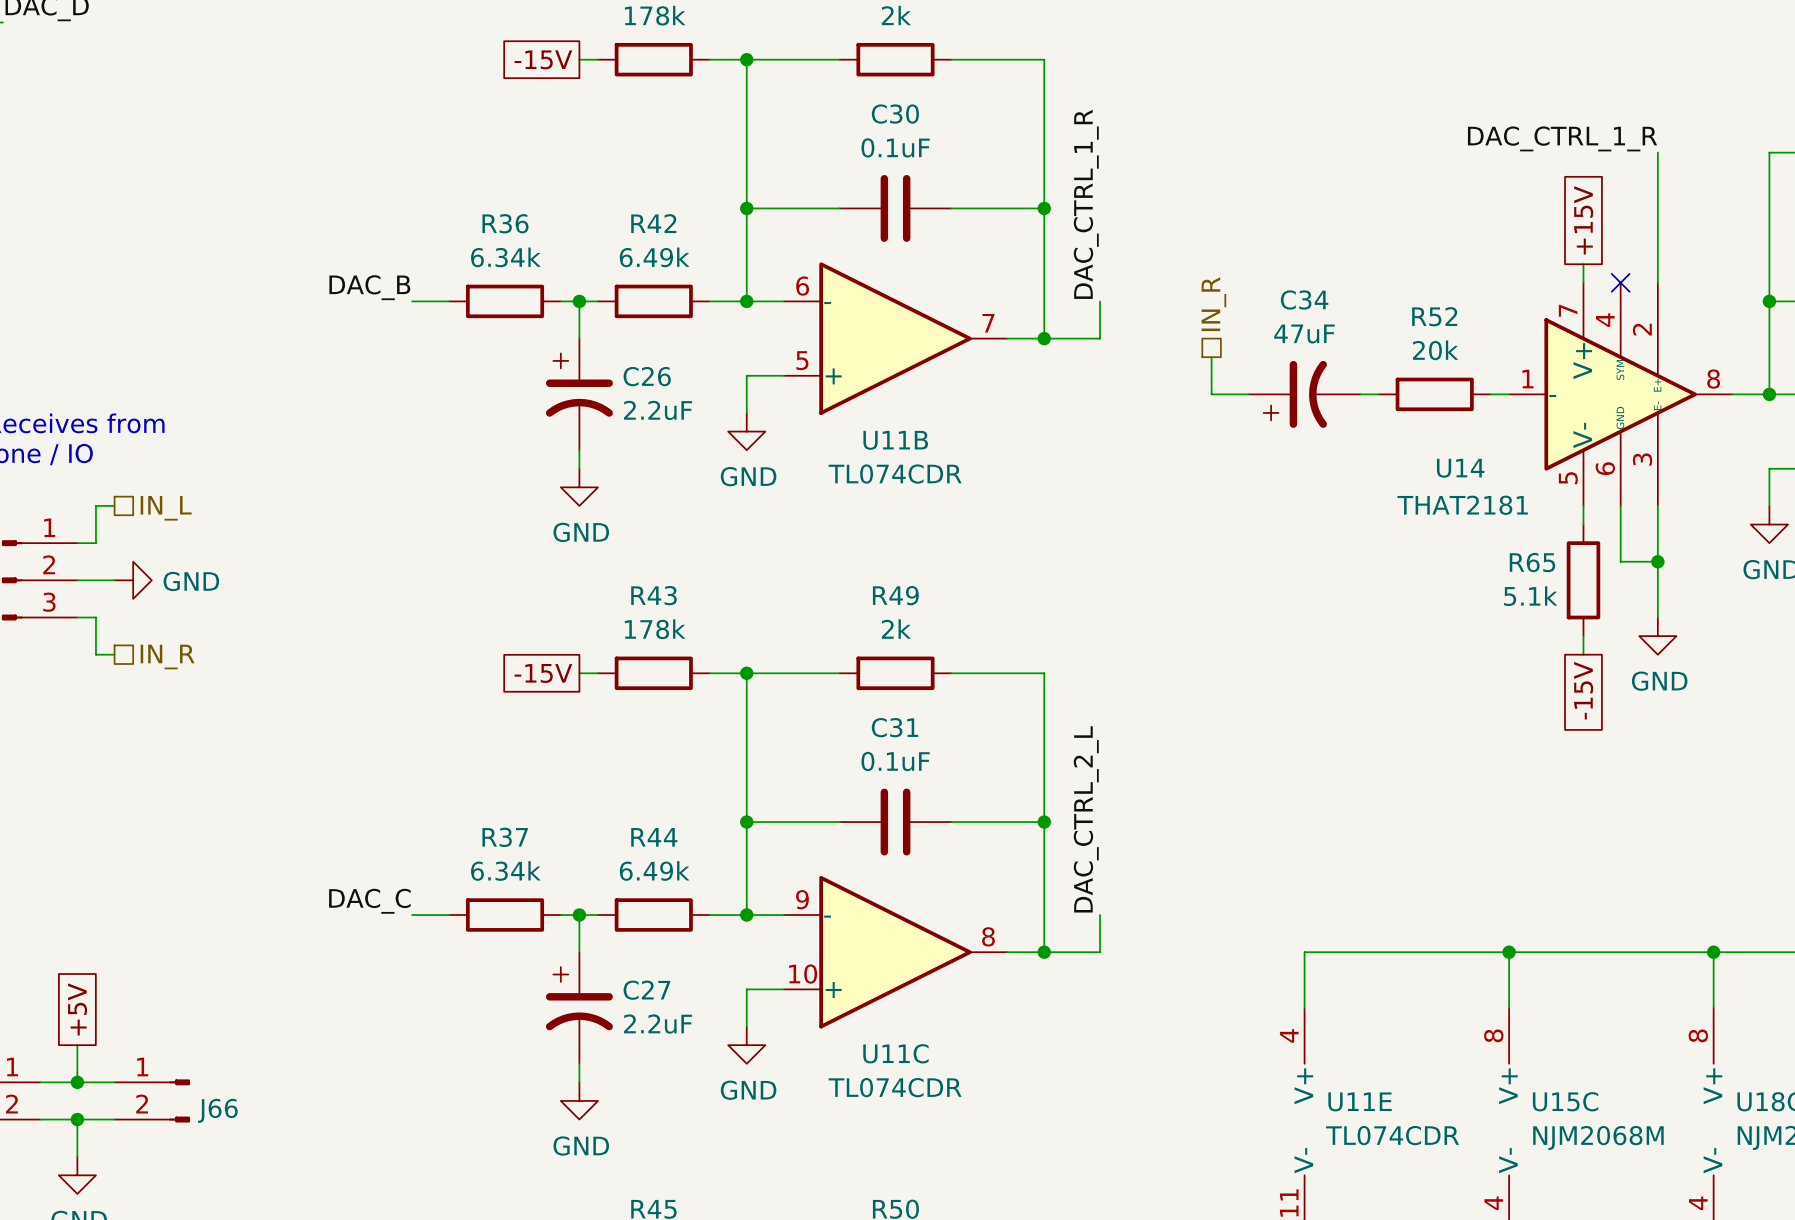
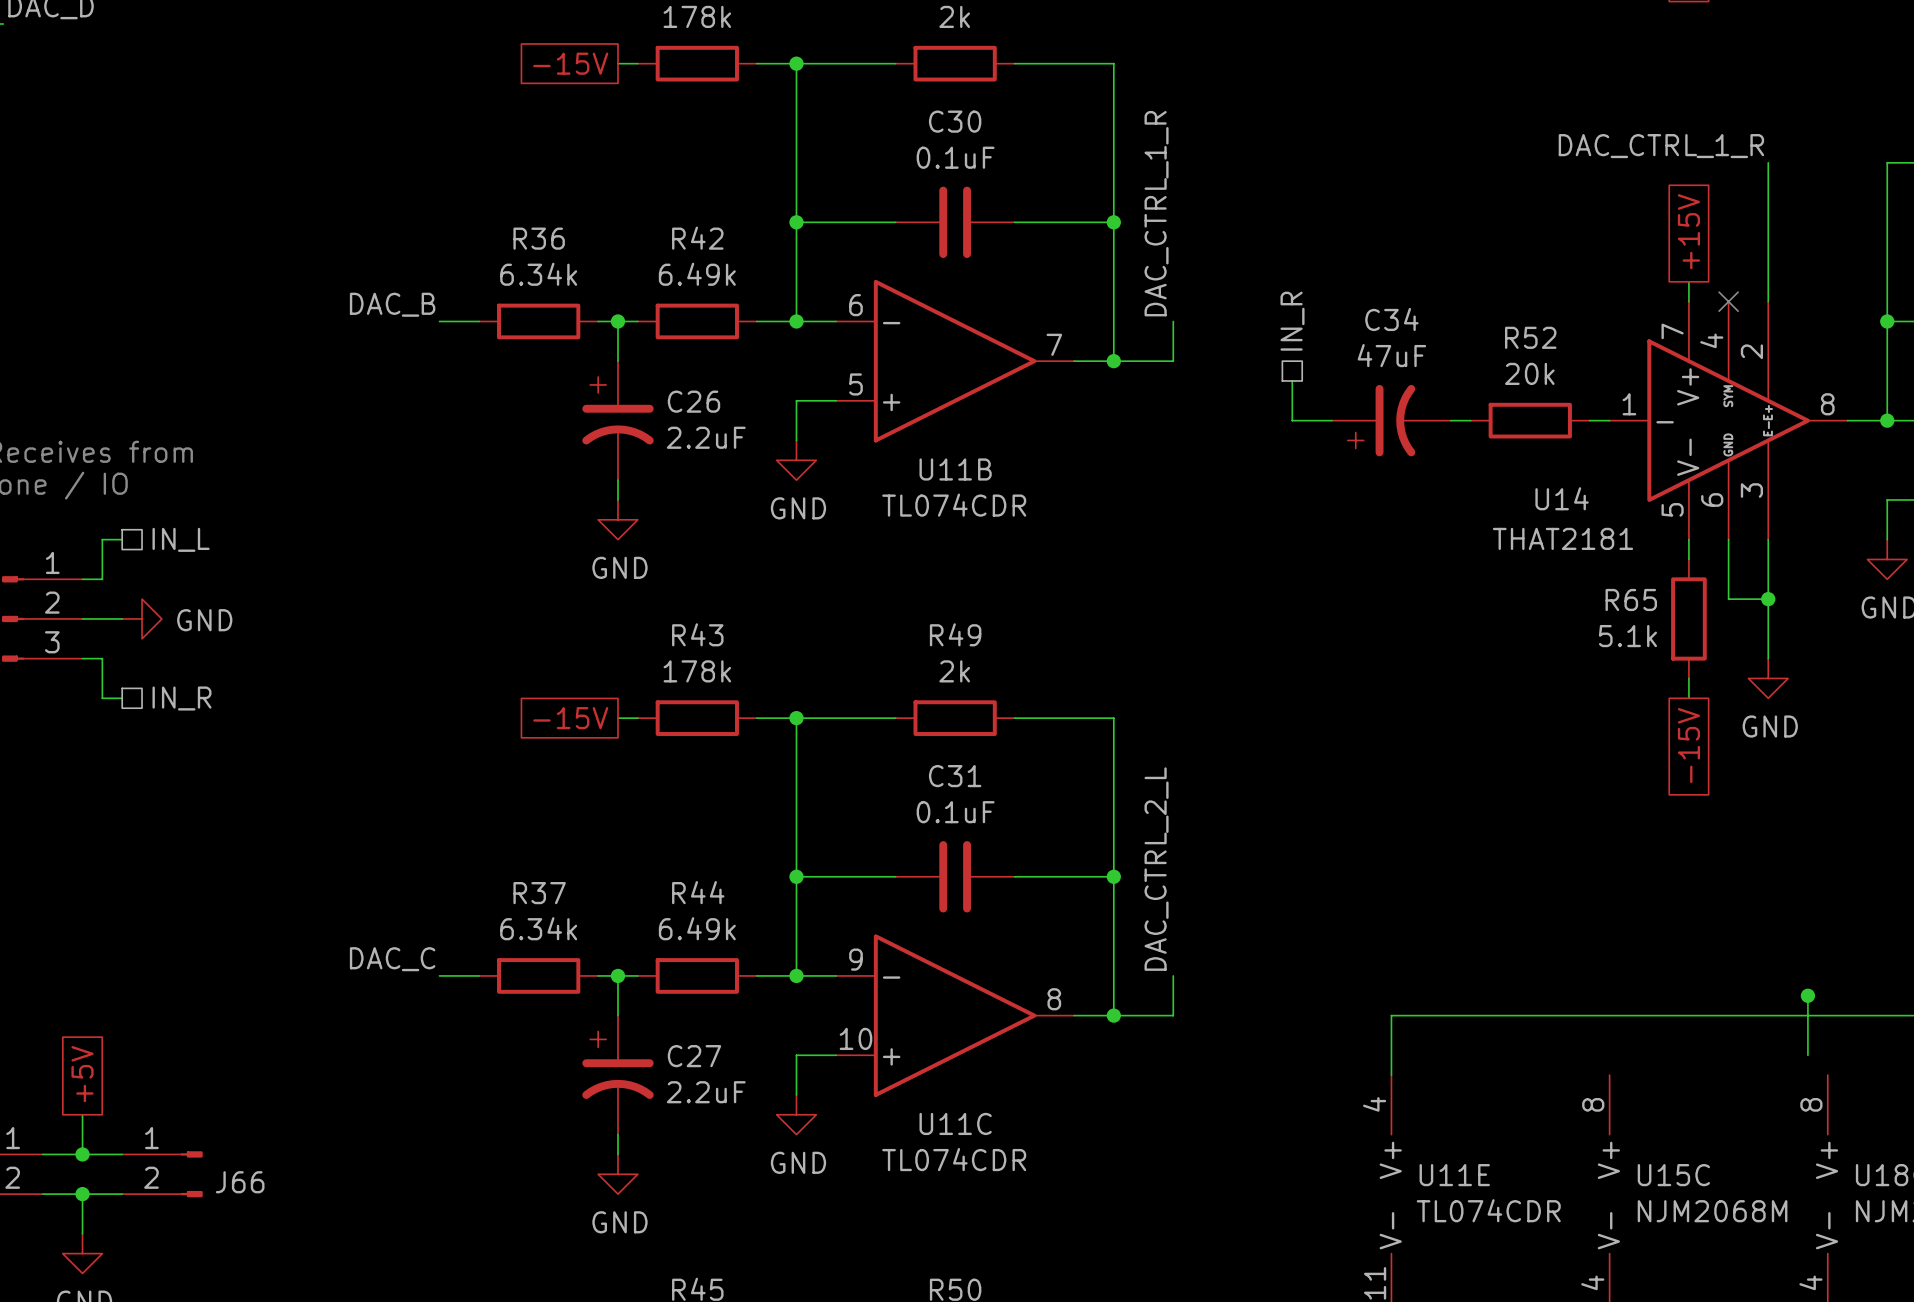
wire: (1509, 952) (1509, 1007) -> (1807, 995) (1807, 1055)
junction: (1509, 952) -> none
wire: (1713, 952) (1713, 1007) -> none
junction position: (1713, 952) -> (1807, 995)

